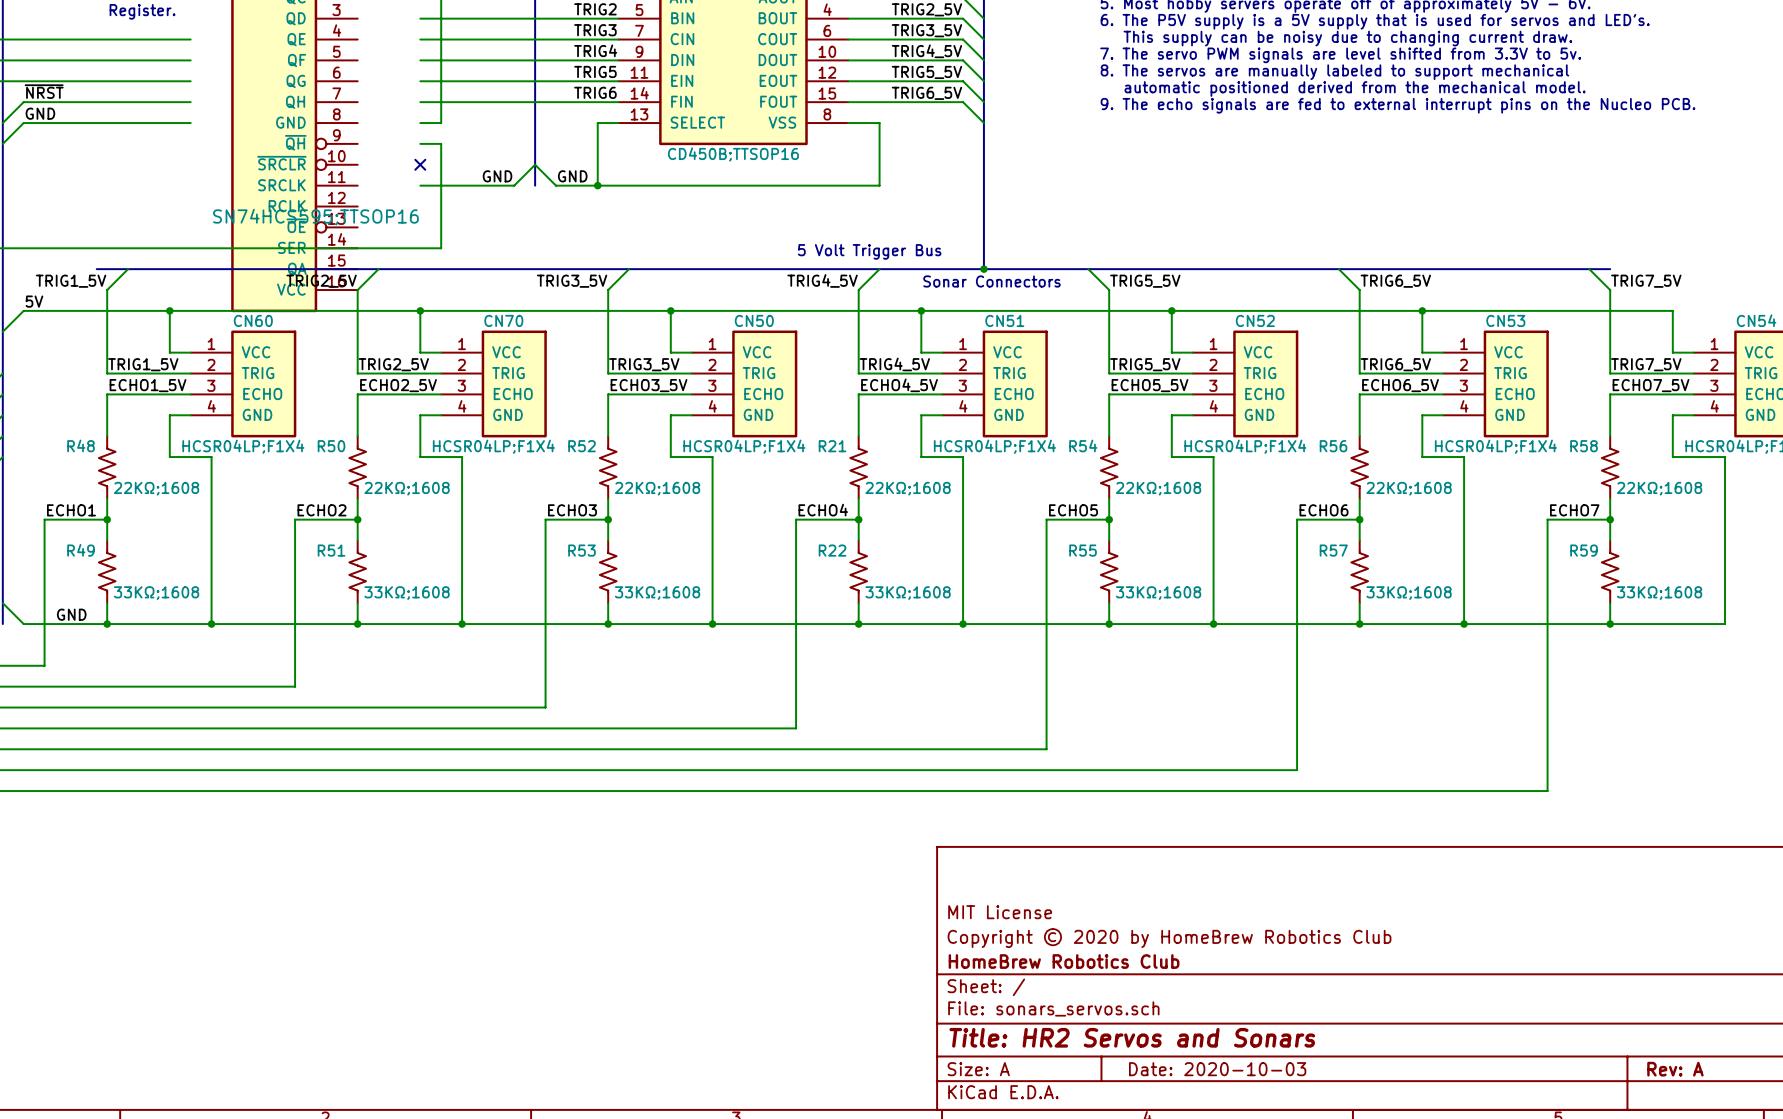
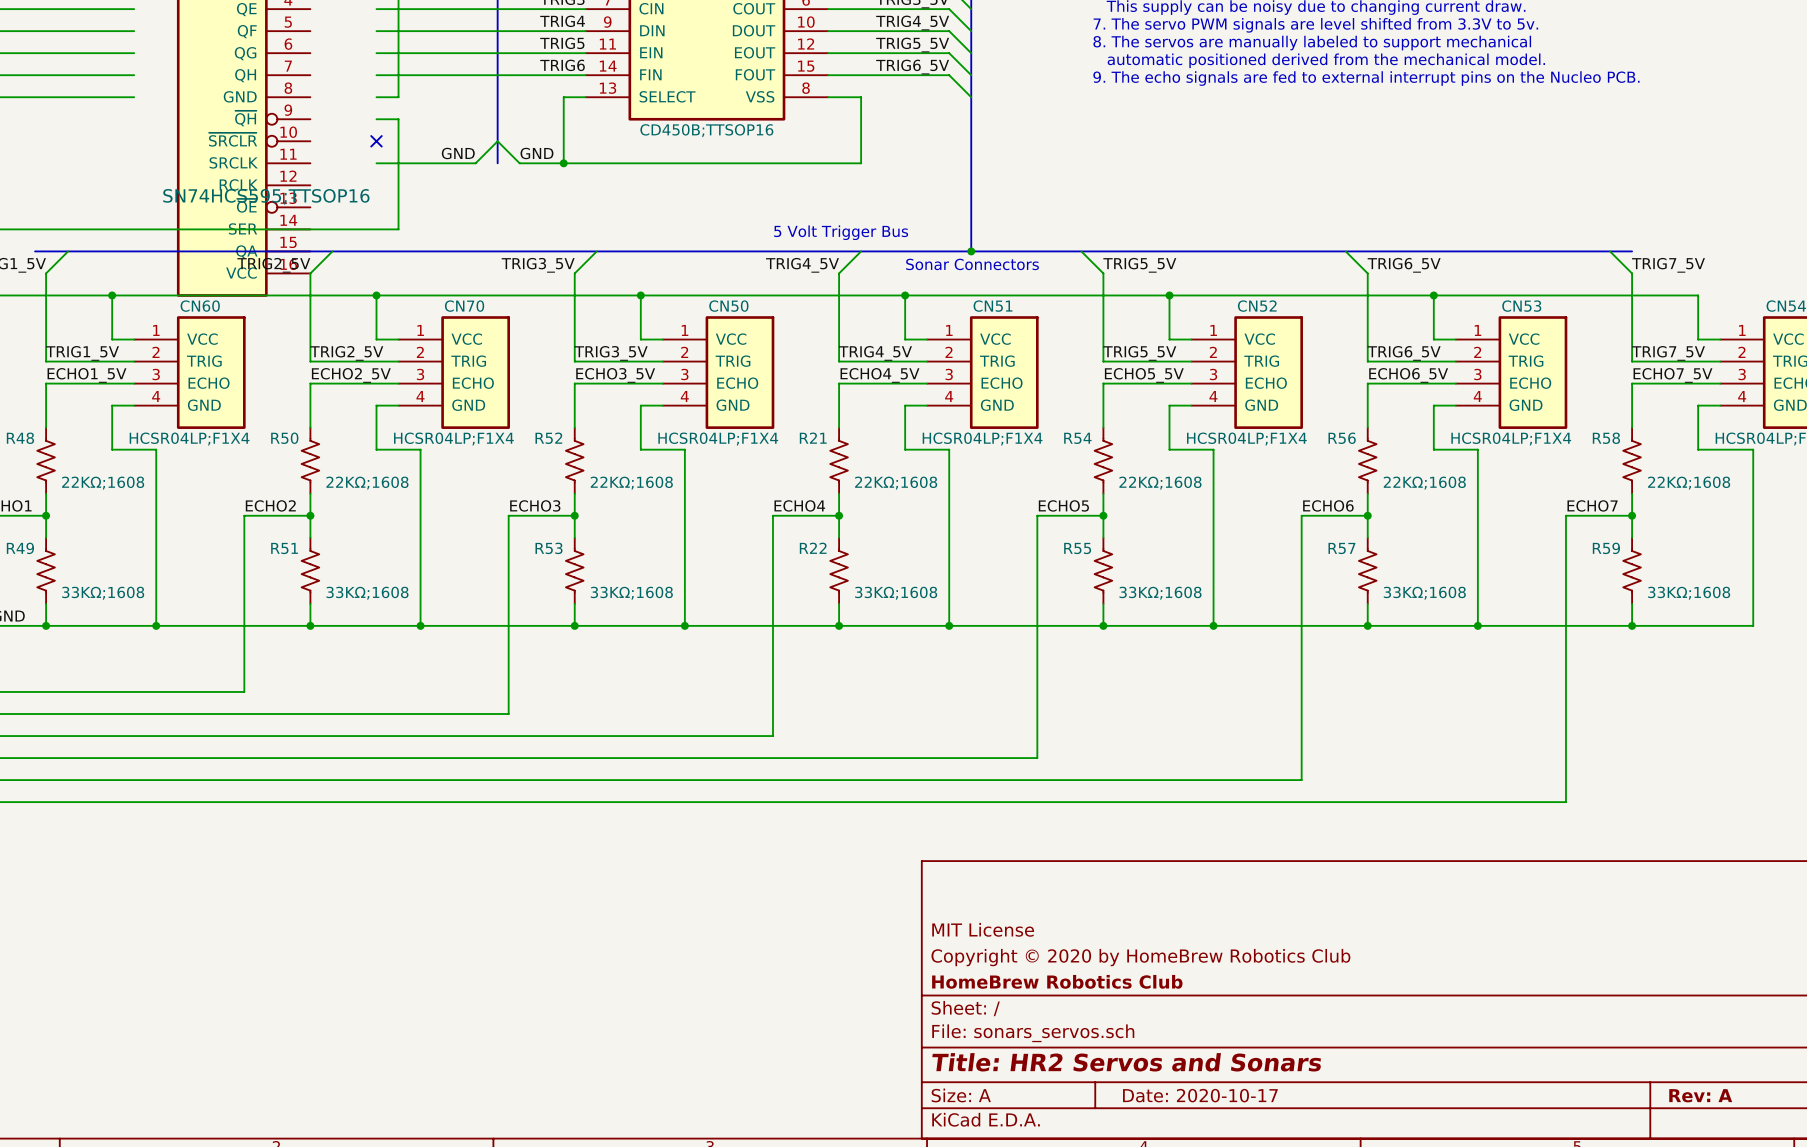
title block: Date: 2020-10-03 (1217, 1069) -> Date: 2020-10-17 (1200, 1095)

